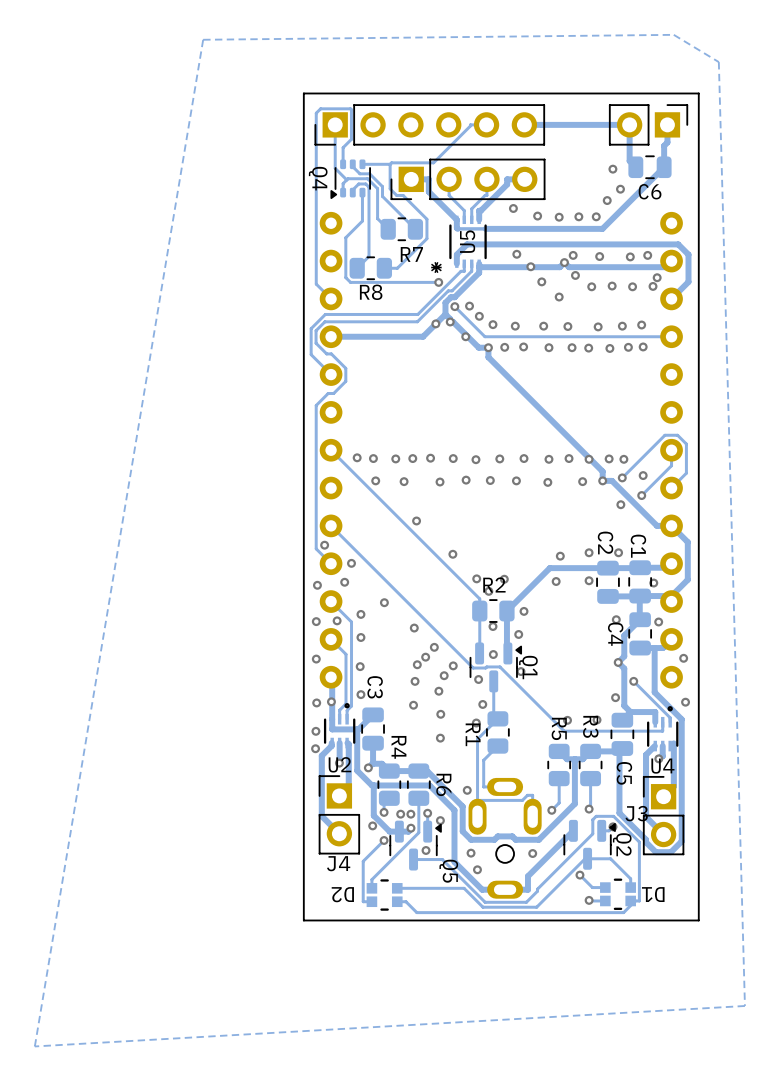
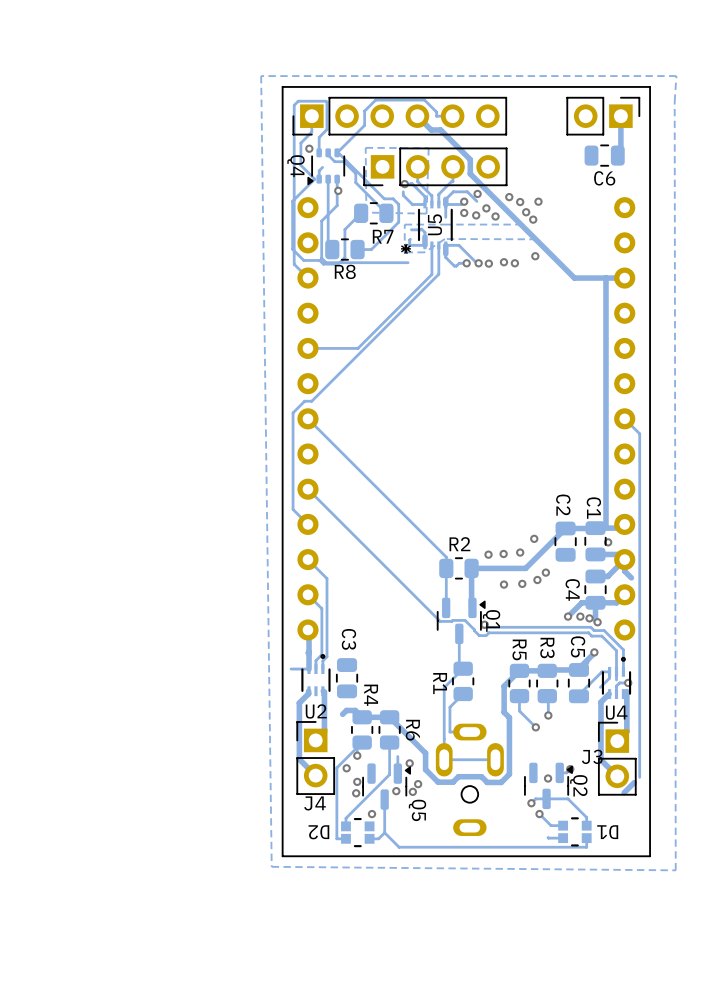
zone outline: (673, 34) (203, 39) (34, 1046) (744, 1005) (718, 62) (673, 34) -> (676, 76) (674, 101) (675, 870) (271, 866) (261, 76) (676, 76)
track: (470, 124) (433, 162) (390, 164) -> (437, 116) (436, 112) (424, 100) (375, 100) (364, 111) (364, 125) (337, 152)
track: (524, 124) (629, 124) (629, 161) (635, 167) -> none
track: (335, 142) (335, 168) (346, 179) (367, 178) (377, 188) (377, 218) (388, 229) -> (311, 132) (300, 143) (300, 165) (314, 179) (292, 201) (292, 249) (303, 260) (319, 260) (323, 264) (338, 264) (344, 257) (344, 229) (361, 213)
track: (667, 142) (664, 145) (664, 167) (602, 228) (457, 228) (456, 219) (428, 191) (428, 179) (411, 179) -> (620, 132) (620, 152) (617, 155)
zone outline: none -> (365, 147) (428, 148) (426, 213) (366, 212) (365, 147)
via: none -> (309, 148)
track: (390, 164) (390, 188) (396, 195) (403, 195) (426, 219) (426, 238) (397, 268) -> (337, 152) (384, 198) (393, 198) (398, 204) (398, 222) (369, 249)
track: (390, 164) (362, 164) -> none
via: (612, 169) -> none
track: (524, 179) (507, 179) (507, 184) (479, 210) (479, 214) -> (476, 201) (467, 191) (453, 191) (445, 199)
via: (620, 189) -> none
track: (352, 192) (352, 189) (358, 183) (365, 183) (368, 187) (368, 256) (357, 268) -> (328, 179) (328, 245) (332, 249)
track: none -> (404, 184) (411, 183) (424, 196) (424, 204) (412, 204) (403, 195) (403, 191)
via: none -> (404, 184)
via: (607, 200) -> none
via: none -> (338, 190)
via: none -> (509, 197)
track: none -> (464, 201) (461, 204) (445, 204) (445, 217)
via: none -> (464, 201)
via: (537, 216) -> none
via: (596, 216) -> none
via: none -> (486, 208)
via: none -> (464, 212)
via: none -> (526, 212)
via: none -> (476, 215)
via: none -> (495, 216)
via: none -> (533, 219)
zone outline: none -> (521, 224) (404, 224) (404, 252) (424, 252) (444, 238) (536, 239) (521, 224)
track: none -> (411, 229) (421, 229) (424, 232) (424, 236)
track: (456, 254) (467, 244) (678, 244) (688, 254) (688, 281) (671, 298) -> (417, 116) (431, 130) (440, 130) (470, 159) (470, 173) (574, 278) (624, 278)
via: (516, 254) -> none
via: (573, 255) -> none
via: (647, 255) -> none
via: (599, 256) -> none
via: (630, 256) -> none
track: none -> (410, 239) (409, 245) (424, 245)
track: (671, 261) (665, 267) (569, 267) (564, 262) (559, 267) (479, 267) -> none
via: (564, 262) -> none
track: none -> (445, 245) (458, 245) (478, 263)
via: (530, 266) -> none
track: (464, 271) (460, 271) (417, 314) (325, 314) (311, 328) (311, 354) (331, 374) -> (431, 252) (431, 274) (357, 348) (307, 348)
track: (471, 271) (452, 290) (448, 290) (417, 321) (324, 321) (316, 330) (316, 343) (326, 353) (331, 353) (345, 368) (345, 381) (333, 393) (328, 393) (316, 405) (316, 548) -> (438, 252) (438, 274) (311, 401) (304, 401) (293, 412) (294, 510)
track: (479, 272) (454, 297) (450, 297) (445, 302) (445, 314) -> (445, 253) (445, 257) (454, 266) (459, 263) (466, 263)
via: (657, 277) -> none
via: (438, 282) -> none
via: none -> (466, 263)
via: none -> (478, 263)
via: none -> (488, 263)
via: none -> (514, 263)
via: (591, 286) -> none
via: (612, 286) -> none
via: (632, 286) -> none
via: (653, 286) -> none
via: (559, 297) -> none
track: none -> (605, 278) (605, 524)
track: (454, 306) (484, 336) (671, 336) -> none
via: (454, 306) -> none
via: (469, 306) -> none
track: (445, 314) (450, 319) (450, 321) (453, 321) (465, 336) (478, 347) (488, 347) (488, 357) (602, 471) (602, 480) (612, 480) (657, 525) (671, 525) (687, 542) (687, 579) (671, 596) -> none
track: (445, 314) (423, 336) (331, 336) -> none
via: (479, 316) -> none
via: (450, 321) -> none
via: (435, 323) -> none
via: (492, 324) -> none
via: (641, 325) -> none
via: (515, 326) -> none
via: (543, 326) -> none
via: (567, 326) -> none
via: (598, 326) -> none
via: (622, 326) -> none
via: (465, 336) -> none
via: (523, 346) -> none
via: (643, 346) -> none
via: (488, 347) -> none
via: (504, 347) -> none
via: (548, 347) -> none
via: (572, 347) -> none
via: (628, 347) -> none
via: (588, 348) -> none
via: (609, 348) -> none
track: (671, 450) (671, 465) (641, 495) -> (624, 418) (639, 433) (639, 777)
via: (357, 457) -> none
via: (373, 458) -> none
via: (395, 458) -> none
via: (412, 458) -> none
via: (430, 458) -> none
via: (453, 458) -> none
via: (499, 458) -> none
via: (524, 458) -> none
via: (569, 458) -> none
via: (609, 458) -> none
via: (475, 459) -> none
via: (548, 459) -> none
via: (589, 459) -> none
via: (623, 459) -> none
via: (643, 475) -> none
track: (622, 477) (664, 435) (677, 435) (686, 444) (686, 473) (671, 488) -> none
via: (622, 477) -> none
via: (375, 480) -> none
via: (466, 480) -> none
via: (490, 480) -> none
via: (516, 480) -> none
via: (602, 480) -> none
via: (404, 481) -> none
via: (582, 481) -> none
via: (440, 482) -> none
via: (547, 482) -> none
via: (641, 495) -> none
via: (620, 504) -> none
via: (416, 520) -> none
via: (324, 545) -> none
via: (589, 552) -> none
via: (618, 552) -> none
via: (452, 554) -> none
via: (560, 556) -> none
via: (351, 563) -> none
track: (607, 568) (549, 568) (506, 611) -> (565, 528) (525, 568) (471, 568)
via: (476, 578) -> none
via: (504, 579) -> none
via: none -> (534, 538)
via: (589, 580) -> none
via: (556, 581) -> none
via: (344, 582) -> none
via: (317, 585) -> none
via: (488, 591) -> none
via: none -> (520, 552)
via: none -> (503, 553)
via: none -> (488, 554)
track: (607, 596) (639, 596) (640, 619) (624, 635) (624, 656) (618, 662) (624, 668) (624, 705) (630, 712) (655, 712) (655, 722) -> none
via: (384, 602) -> none
via: (524, 611) -> none
via: (360, 614) -> none
via: none -> (545, 572)
via: (616, 619) -> none
track: none -> (595, 576) (607, 576) (624, 559) (624, 571) (631, 577)
via: (337, 620) -> none
via: (316, 621) -> none
via: (658, 621) -> none
via: none -> (537, 580)
via: (492, 626) -> none
via: none -> (522, 583)
via: (414, 628) -> none
via: none -> (503, 584)
via: (518, 634) -> none
via: (360, 637) -> none
via: (434, 647) -> none
track: (654, 648) (654, 692) (681, 719) (681, 841) -> none
via: (493, 654) -> none
via: (425, 657) -> none
via: (683, 658) -> none
via: (316, 659) -> none
track: none -> (568, 616) (581, 602) (595, 602) (595, 620) (597, 622)
via: none -> (568, 616)
via: (618, 662) -> none
via: none -> (580, 616)
via: (417, 664) -> none
via: none -> (589, 618)
via: (453, 665) -> none
via: (360, 666) -> none
via: none -> (597, 622)
via: (444, 675) -> none
track: (509, 676) (564, 731) (662, 731) -> (474, 629) (479, 635) (486, 635) (488, 632) (588, 632) (591, 636) (601, 636) (616, 650) (616, 671)
via: (478, 679) -> none
via: (415, 681) -> none
track: (633, 681) (670, 717) -> (482, 627) (590, 627) (594, 630) (604, 630) (623, 649) (623, 667)
via: (633, 681) -> none
via: (438, 691) -> none
via: (360, 694) -> none
via: (615, 697) -> none
via: (331, 701) -> none
via: none -> (594, 652)
via: (316, 702) -> none
via: (685, 702) -> none
via: (482, 704) -> none
via: (413, 705) -> none
track: (373, 714) (358, 729) (332, 729) (332, 719) -> (291, 669) (309, 669)
via: (440, 714) -> none
via: (597, 719) -> none
via: (567, 720) -> none
via: (476, 723) -> none
track: (357, 729) (357, 770) (371, 785) (429, 785) (454, 810) (454, 861) (482, 889) (527, 889) (527, 876) (573, 830) -> none
via: (315, 731) -> none
via: none -> (628, 682)
via: (440, 738) -> none
track: none -> (600, 687) (609, 678) (609, 671) (601, 671) (577, 696)
track: (339, 743) (339, 763) -> none
track: (373, 743) (373, 763) -> none
track: (662, 746) (662, 756) (658, 758) -> (616, 694) (616, 686) (619, 682) (627, 683)
via: (315, 748) -> none
track: none -> (519, 696) (519, 710) (535, 727)
track: none -> (547, 696) (548, 715)
track: (559, 751) (567, 759) (582, 759) (590, 751) (619, 751) (619, 813) (655, 852) (670, 852) -> none
via: (658, 758) -> none
track: (574, 759) (574, 803) (538, 839) (515, 839) (512, 836) (497, 836) (494, 839) (471, 839) (462, 831) (462, 806) (427, 771) (418, 771) -> (594, 652) (577, 669) (519, 670) (504, 686) (504, 712) (509, 717) (509, 774) (501, 782) (487, 782) (481, 776) (458, 776) (453, 782) (438, 782) (425, 769) (425, 753) (389, 717)
via: (339, 763) -> none
R5 position: (559, 764) -> (519, 683)
R3 position: (590, 764) -> (547, 683)
via: (368, 767) -> none
via: none -> (548, 715)
C5 name position: C5 (624, 773) -> C5 (578, 646)
track: (559, 778) (559, 802) (551, 810) -> none
track: (590, 778) (589, 809) -> none
via: none -> (535, 727)
track: (373, 785) (373, 815) (389, 831) (408, 831) (410, 828) -> none
via: (467, 790) -> none
track: (477, 800) (522, 800) (527, 795) (532, 795) (532, 816) -> (444, 759) (495, 759)
via: (589, 809) -> none
via: (551, 810) -> none
via: (427, 813) -> none
via: (400, 814) -> none
via: (410, 814) -> none
via: (410, 828) -> none
via: none -> (548, 778)
track: (384, 840) (363, 861) (363, 901) -> (357, 747) (336, 767) (337, 838)
via: none -> (418, 784)
via: none -> (412, 791)
via: none -> (356, 793)
via: (471, 853) -> none
via: (532, 853) -> none
track: (585, 858) (536, 907) (483, 907) (464, 888) (397, 888) -> (544, 798) (535, 798) (531, 803)
track: (413, 859) (442, 859) (485, 902) (526, 902) (592, 833) (592, 819) (596, 816) (613, 816) (639, 842) (639, 900) (630, 900) -> (384, 832) (399, 847) (586, 847) (586, 838)
track: none -> (384, 799) (384, 832)
via: none -> (531, 803)
via: (477, 869) -> none
via: none -> (372, 814)
via: (589, 900) -> none
track: (635, 900) (623, 912) (416, 912) (405, 901) -> (384, 832) (377, 838)

